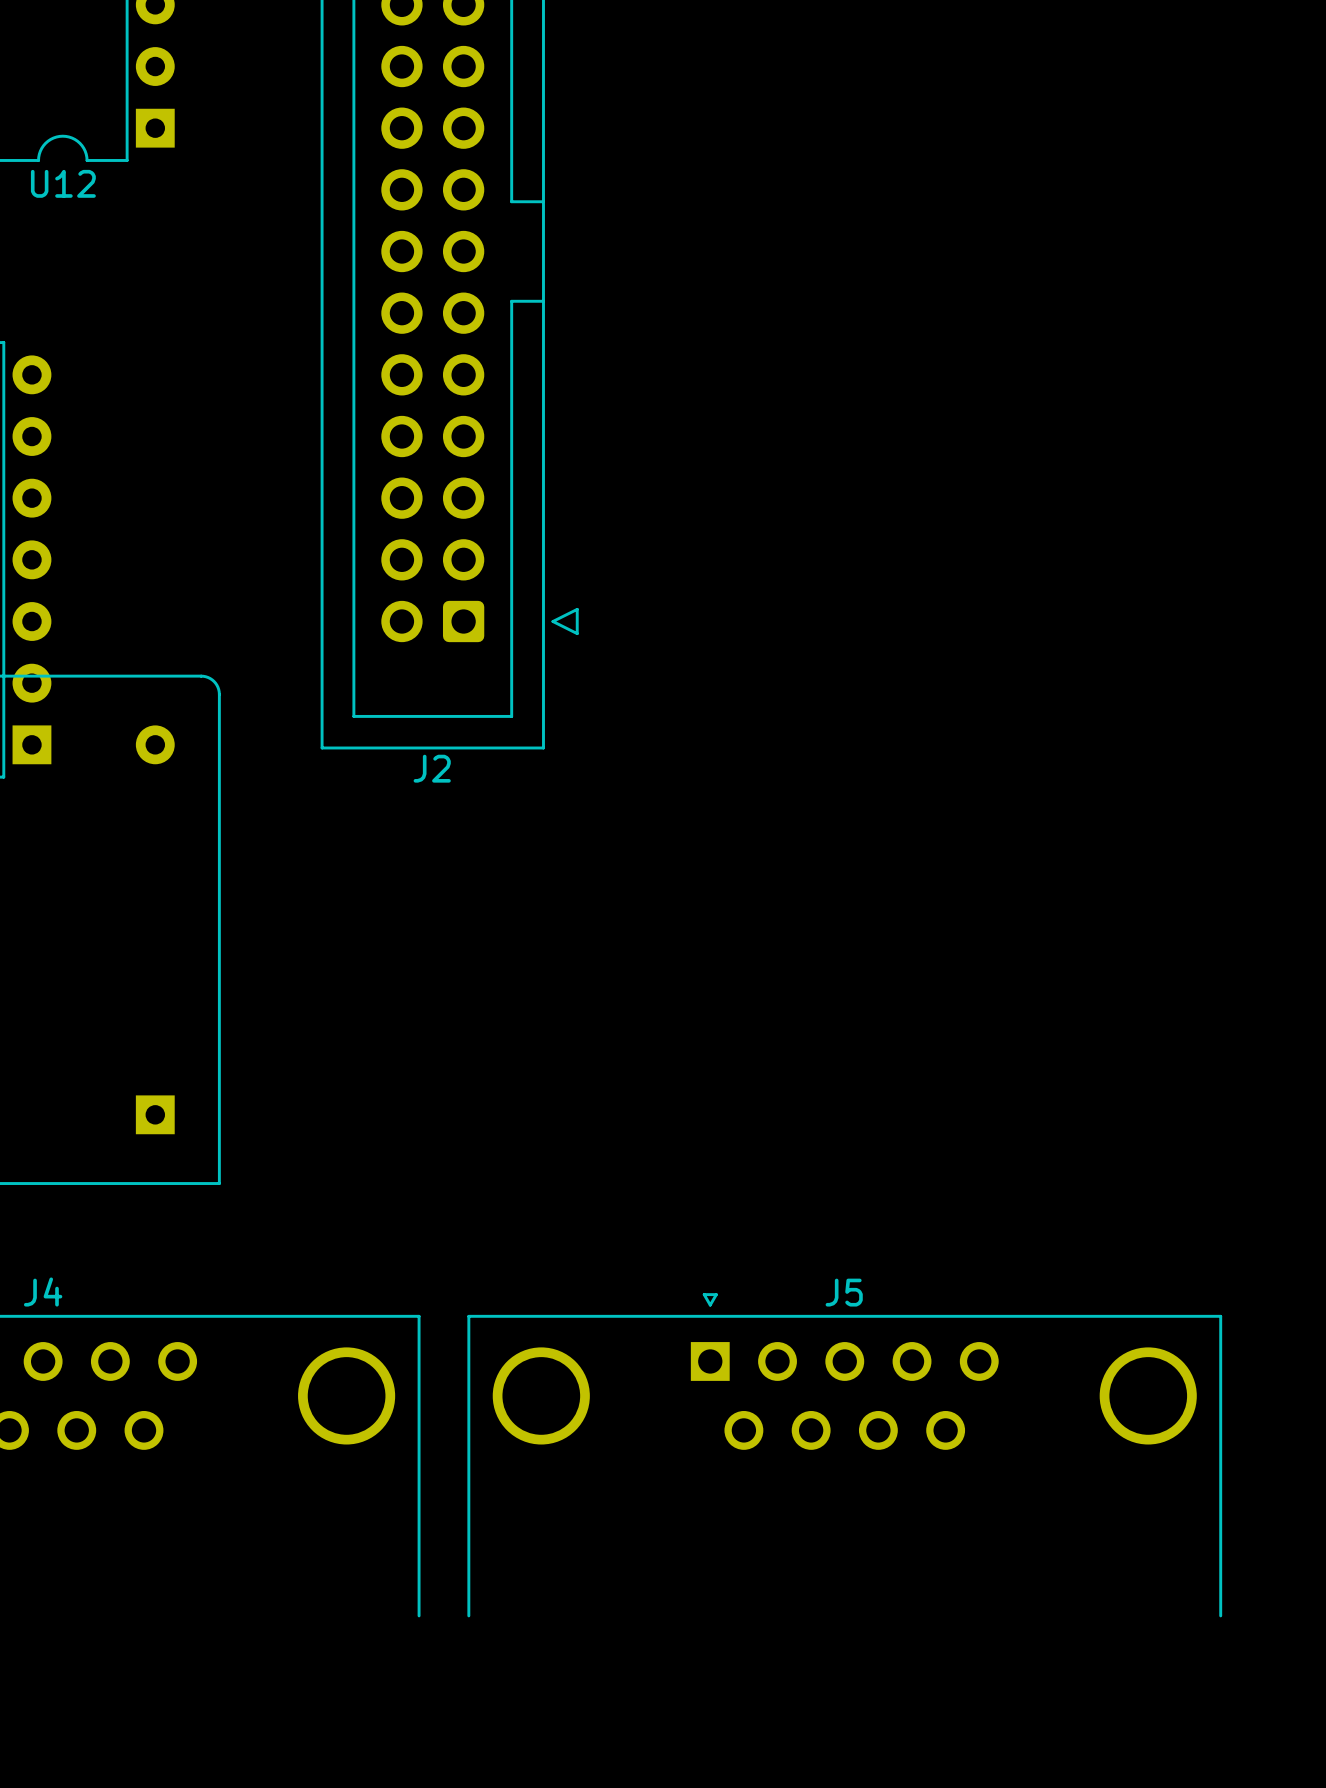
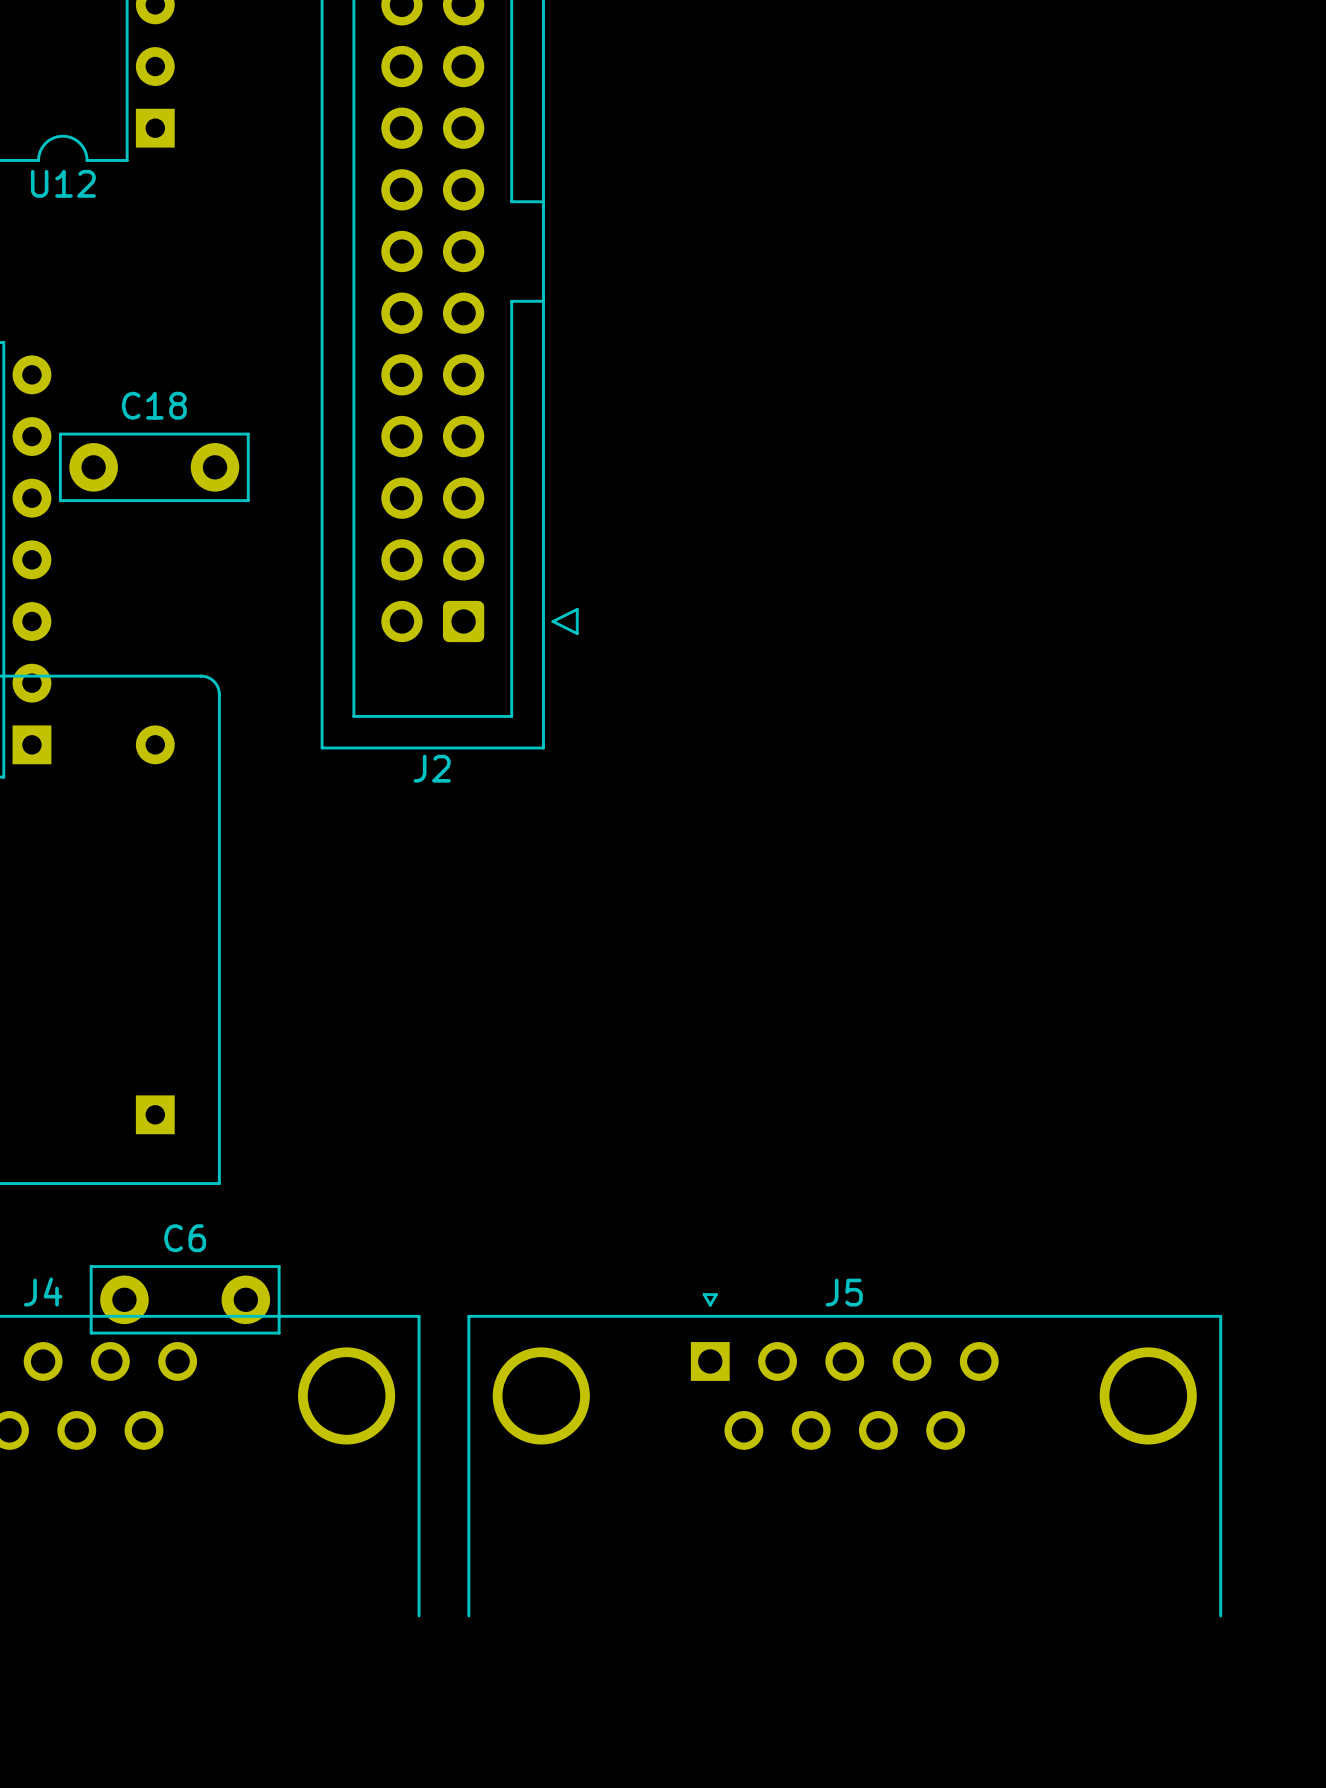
C18: none -> (154, 467)
C6: none -> (185, 1299)

